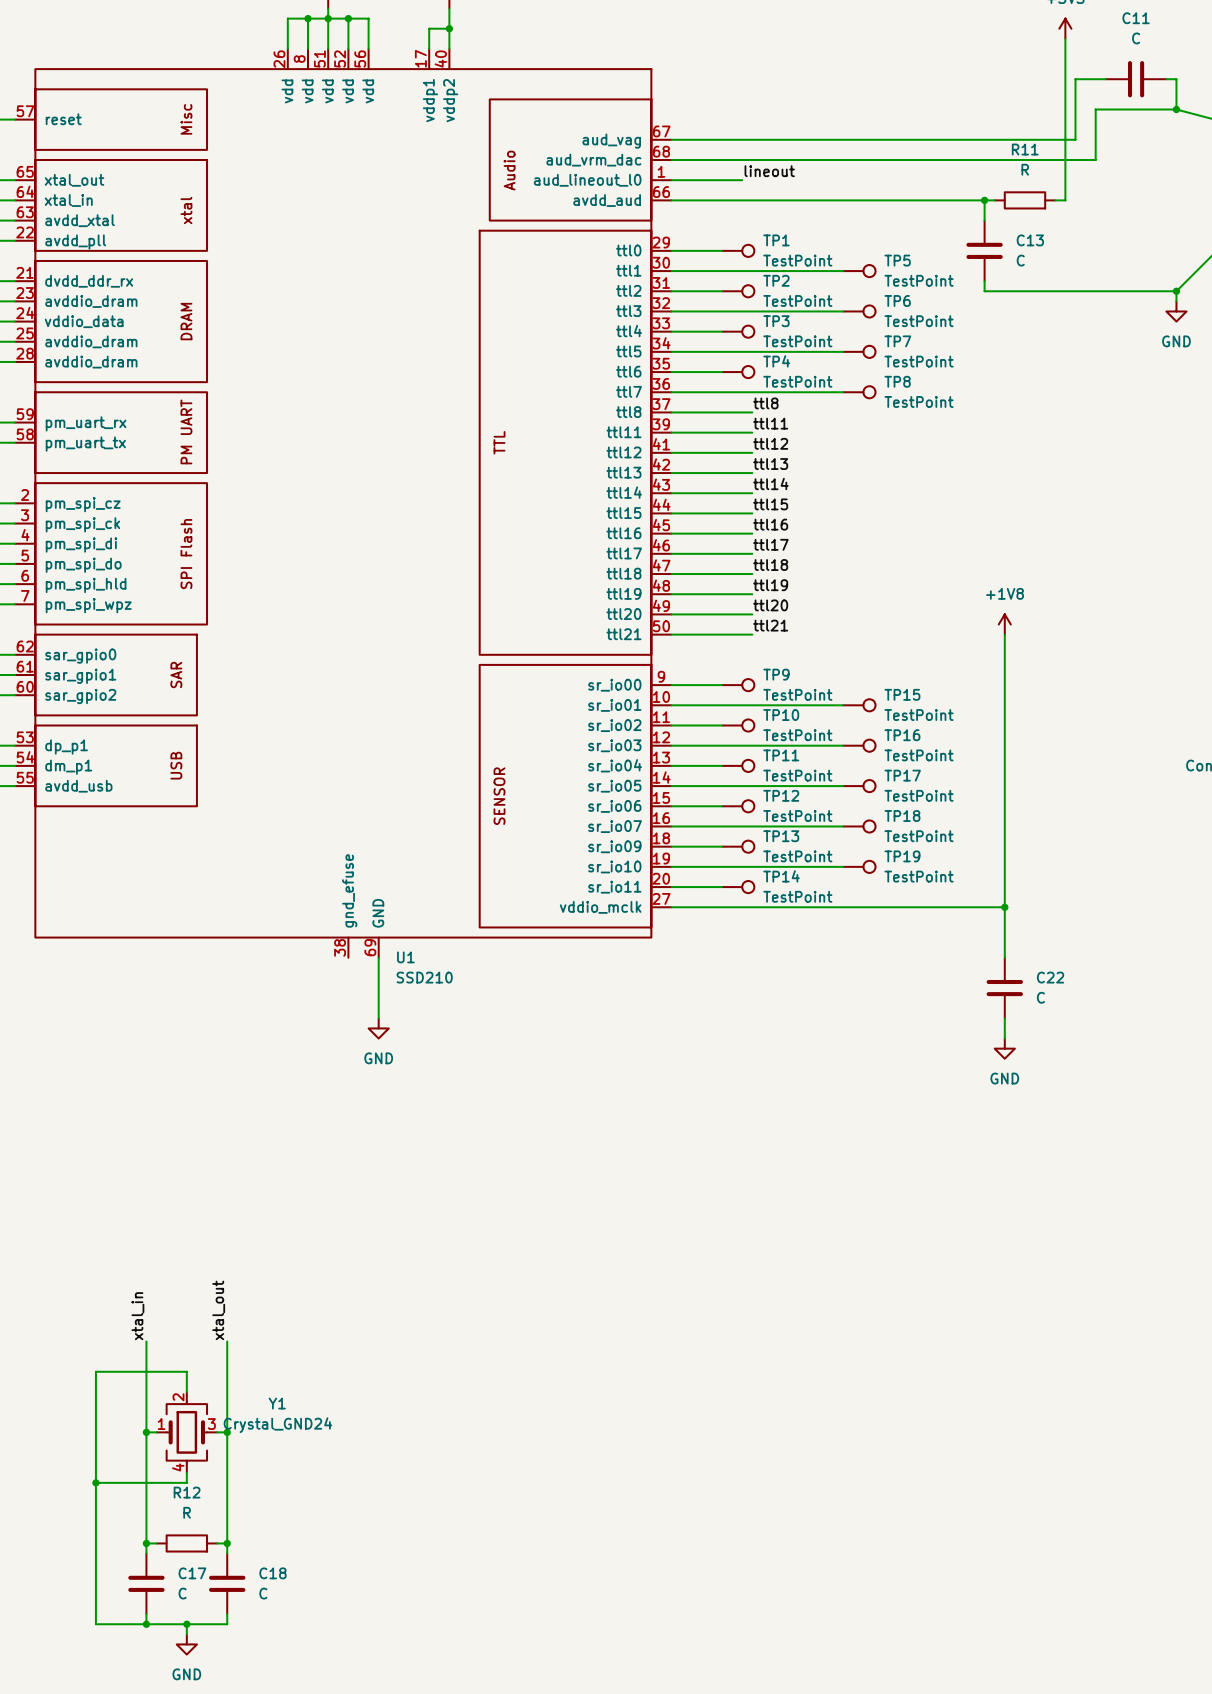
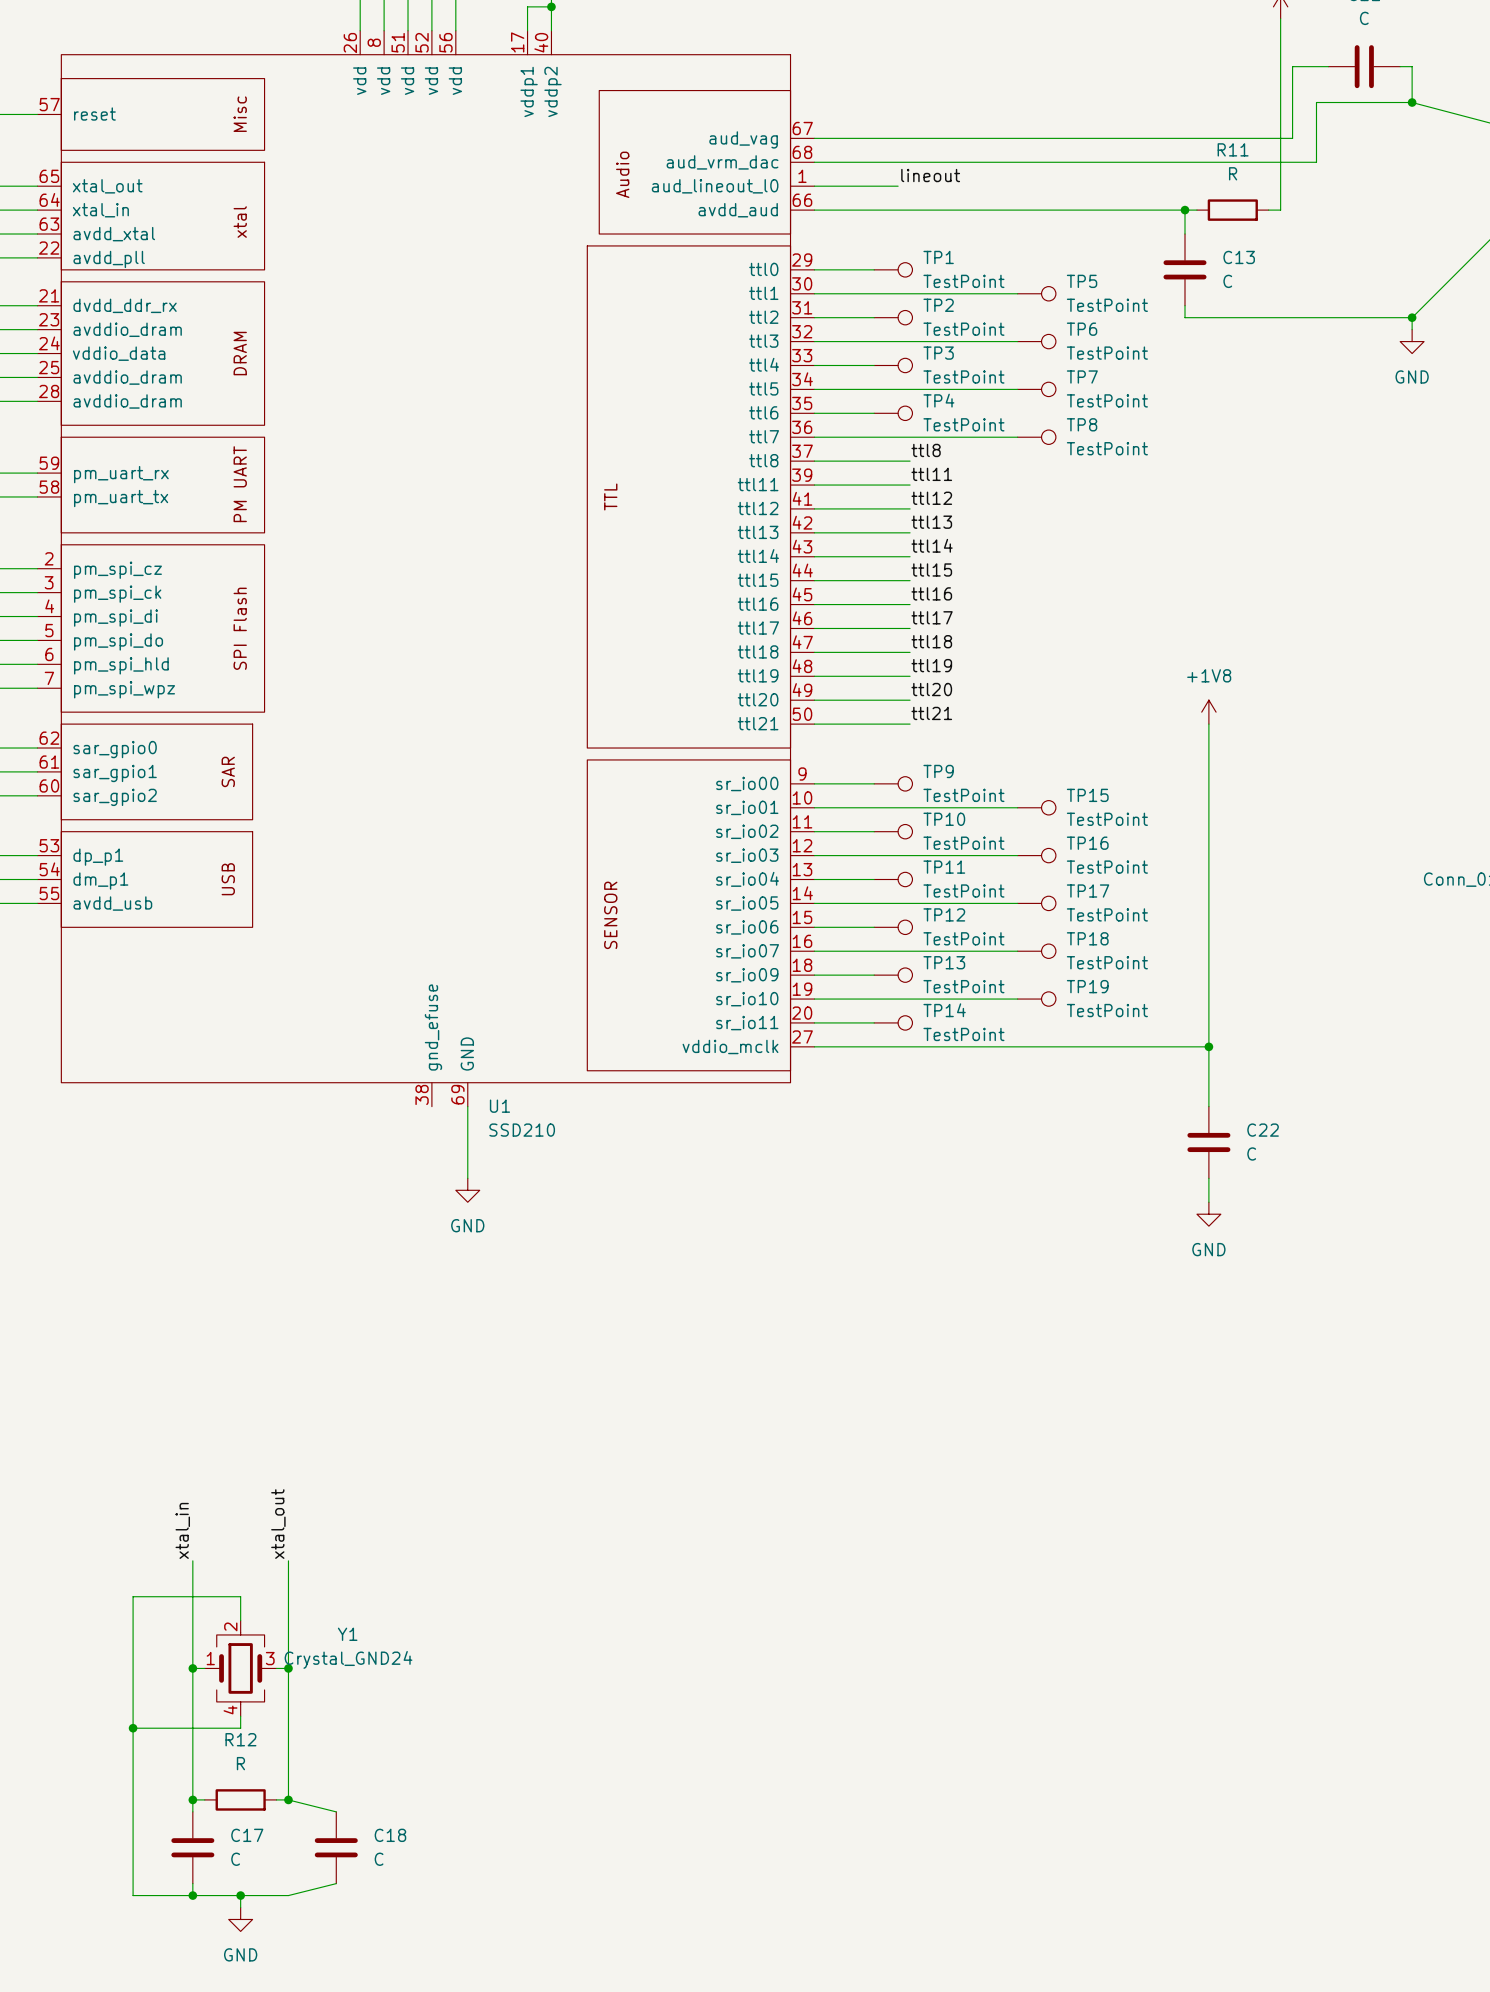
wire: (227, 1543) (227, 1553) -> (288, 1799) (336, 1811)
C18 position: (227, 1583) -> (336, 1847)
wire: (227, 1614) (227, 1624) -> (336, 1883) (288, 1895)

